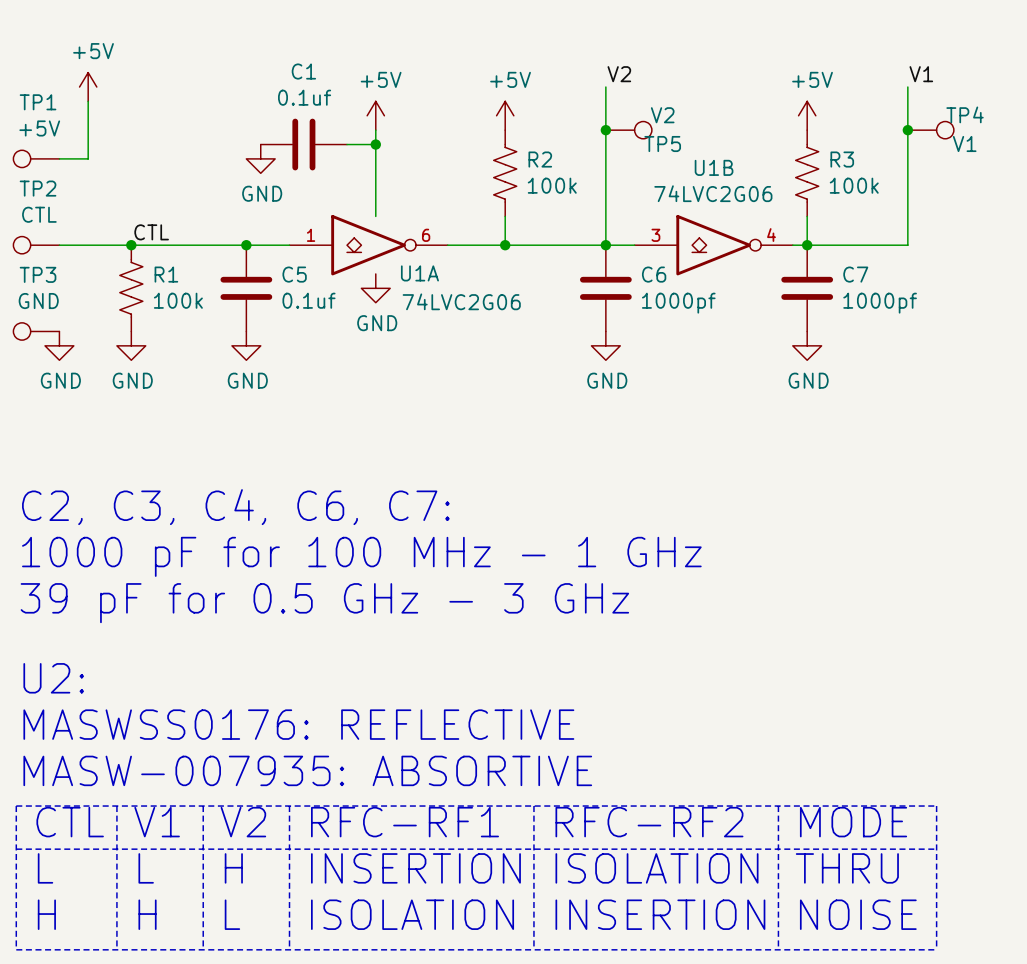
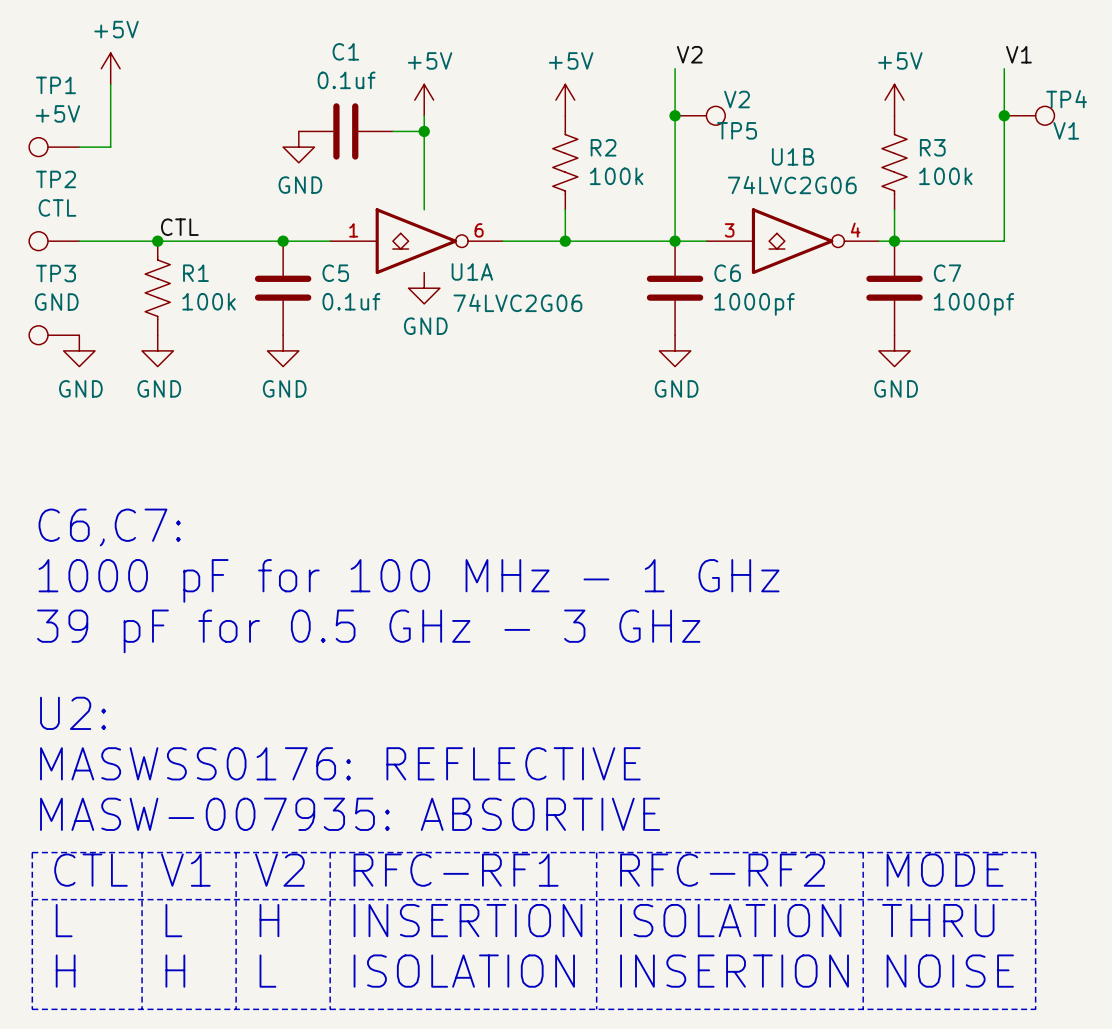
text: C2, C3, C4, C6, C7: (235, 507) -> C6,C7: (109, 527)

